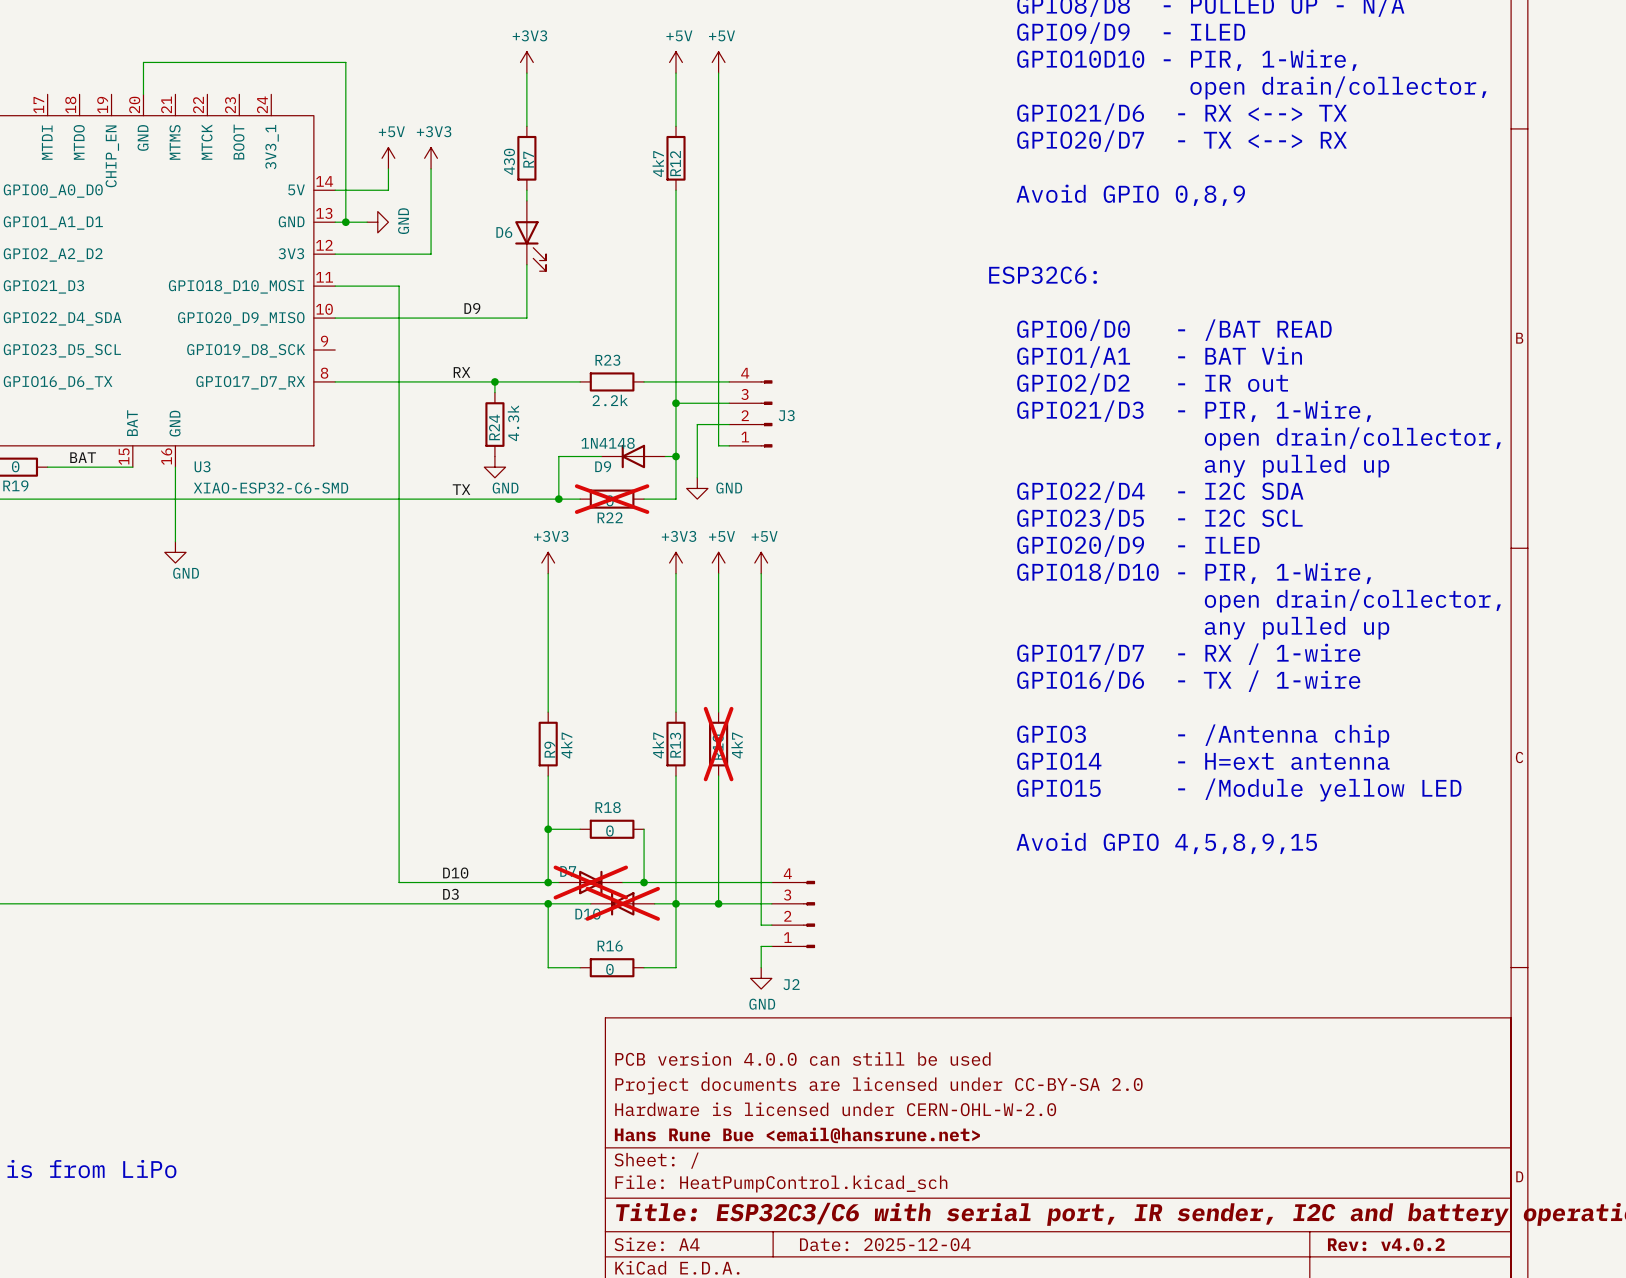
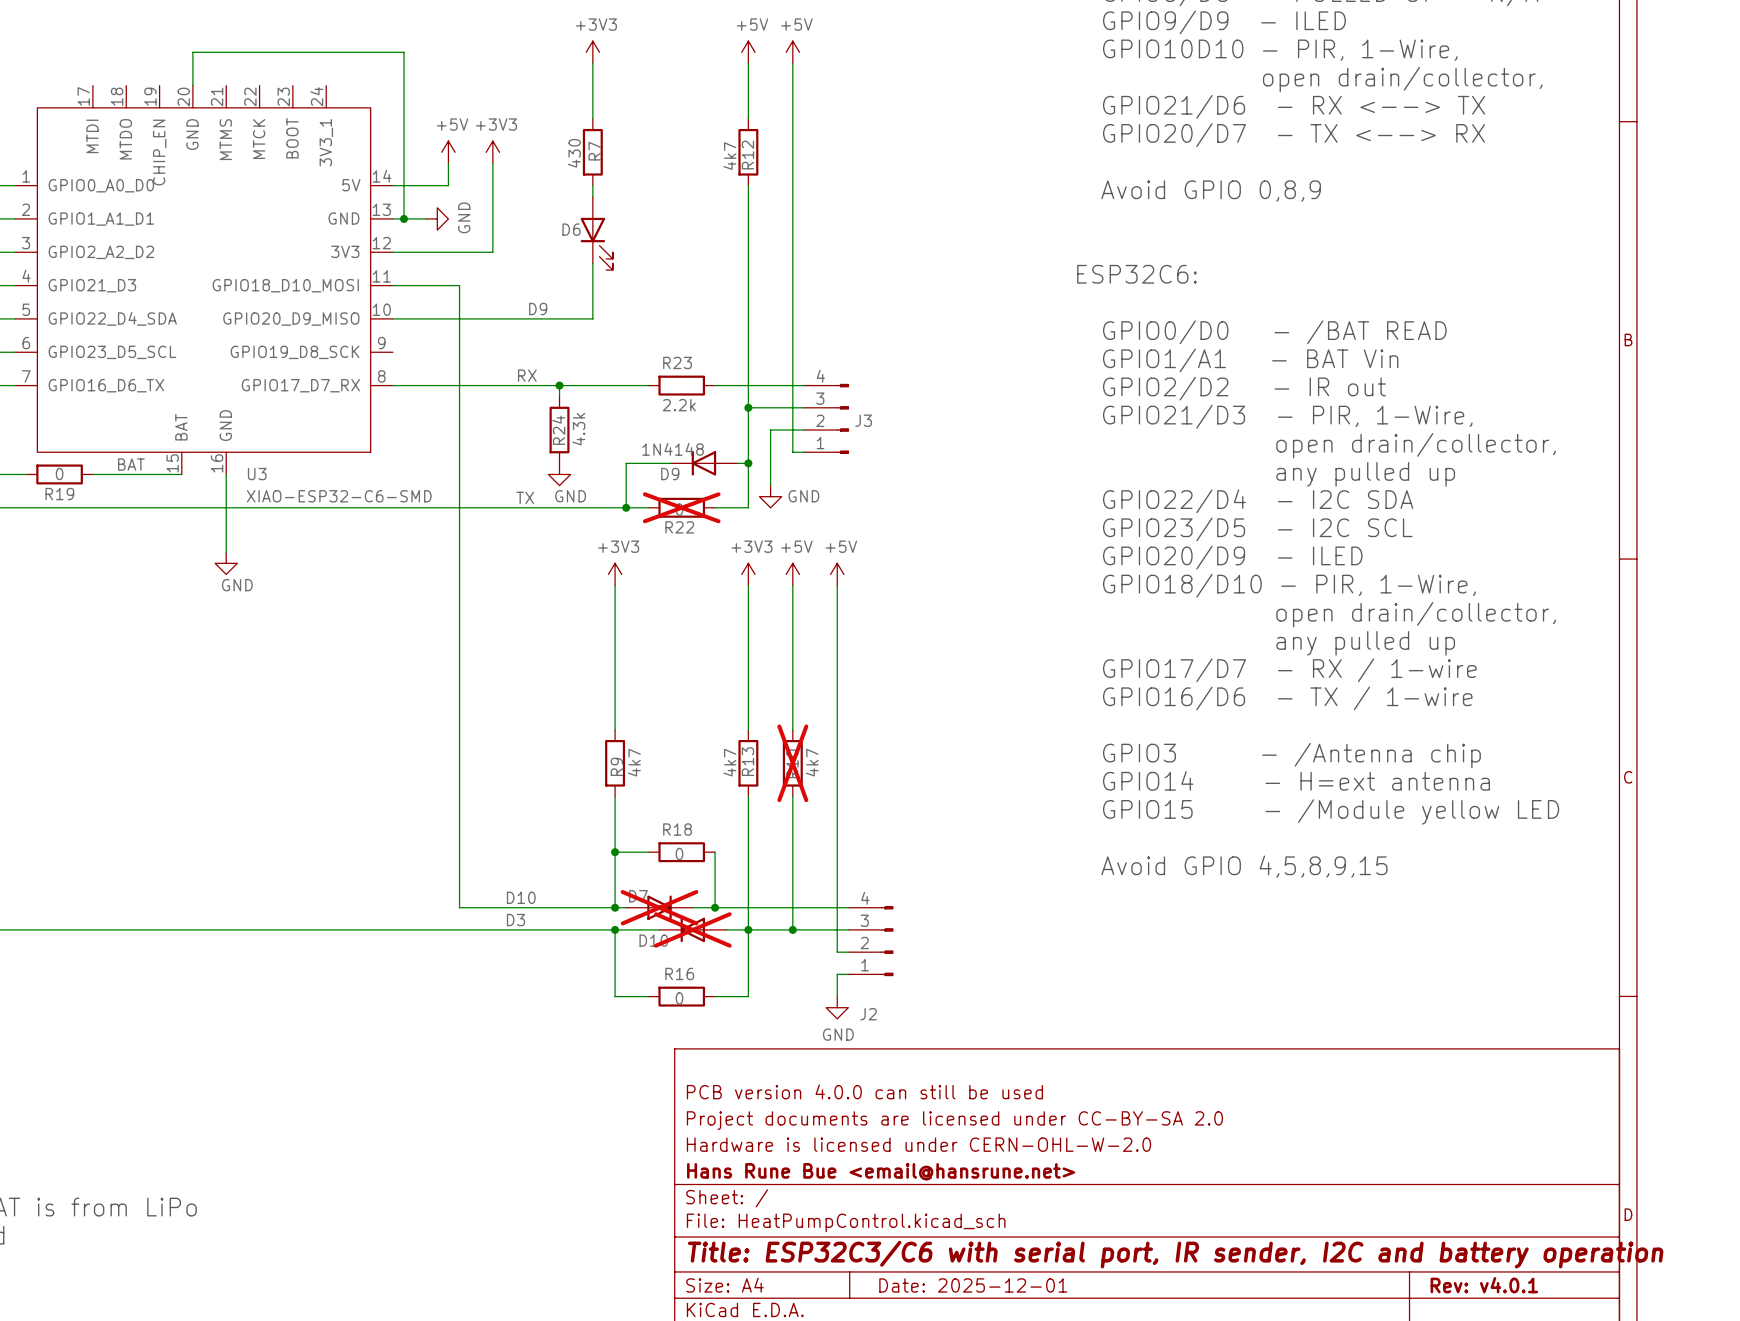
title block: Date: 2025-12-04 (885, 1244) -> Date: 2025-12-01 (973, 1285)
title block: Rev: v4.0.2 (1386, 1244) -> Rev: v4.0.1 (1484, 1285)

